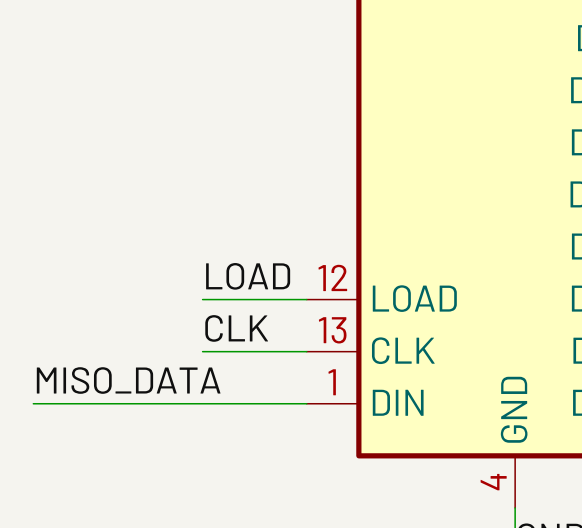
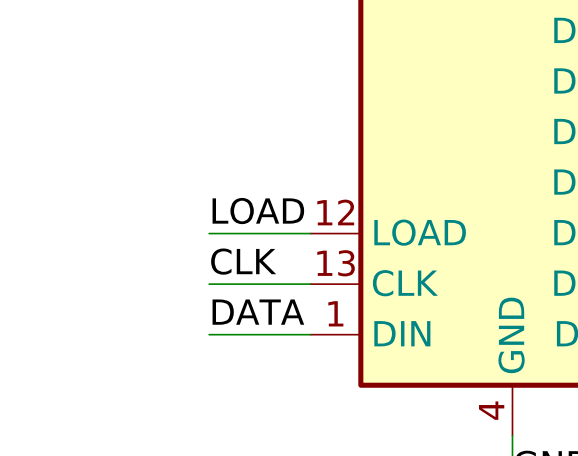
label: MISO_DATA (128, 380) -> DATA (258, 312)
wire: (33, 403) (202, 403) -> none

